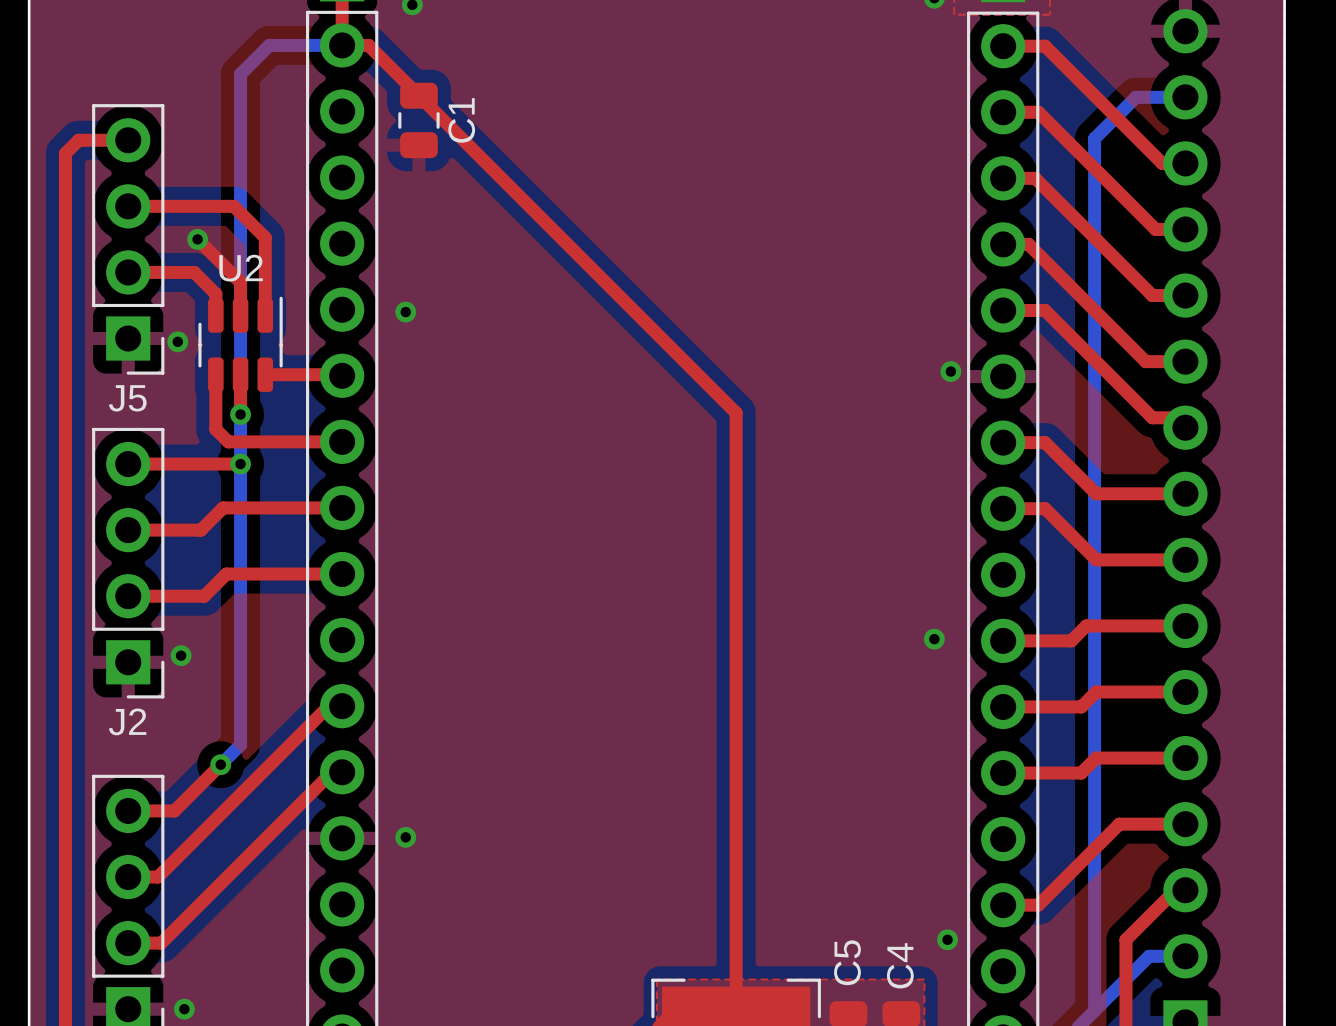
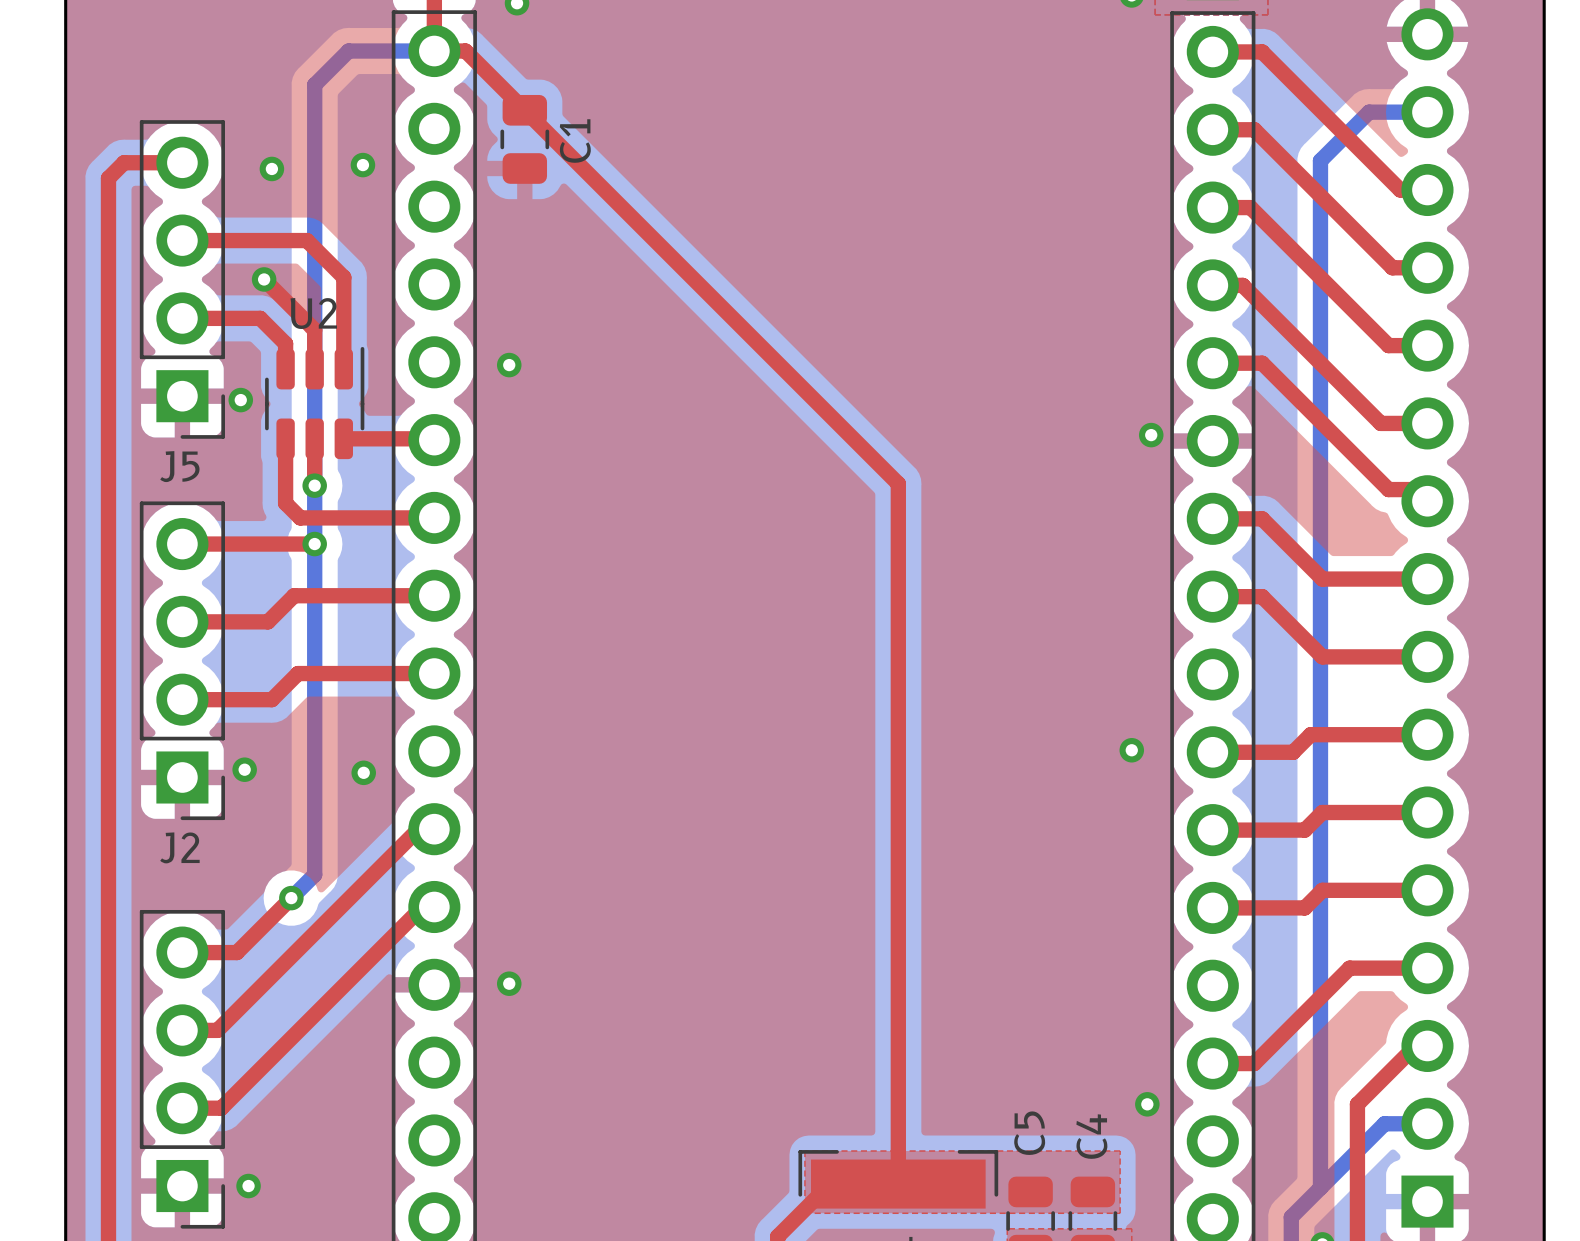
via: none -> (362, 165)
via: none -> (271, 168)
via: none -> (363, 772)

